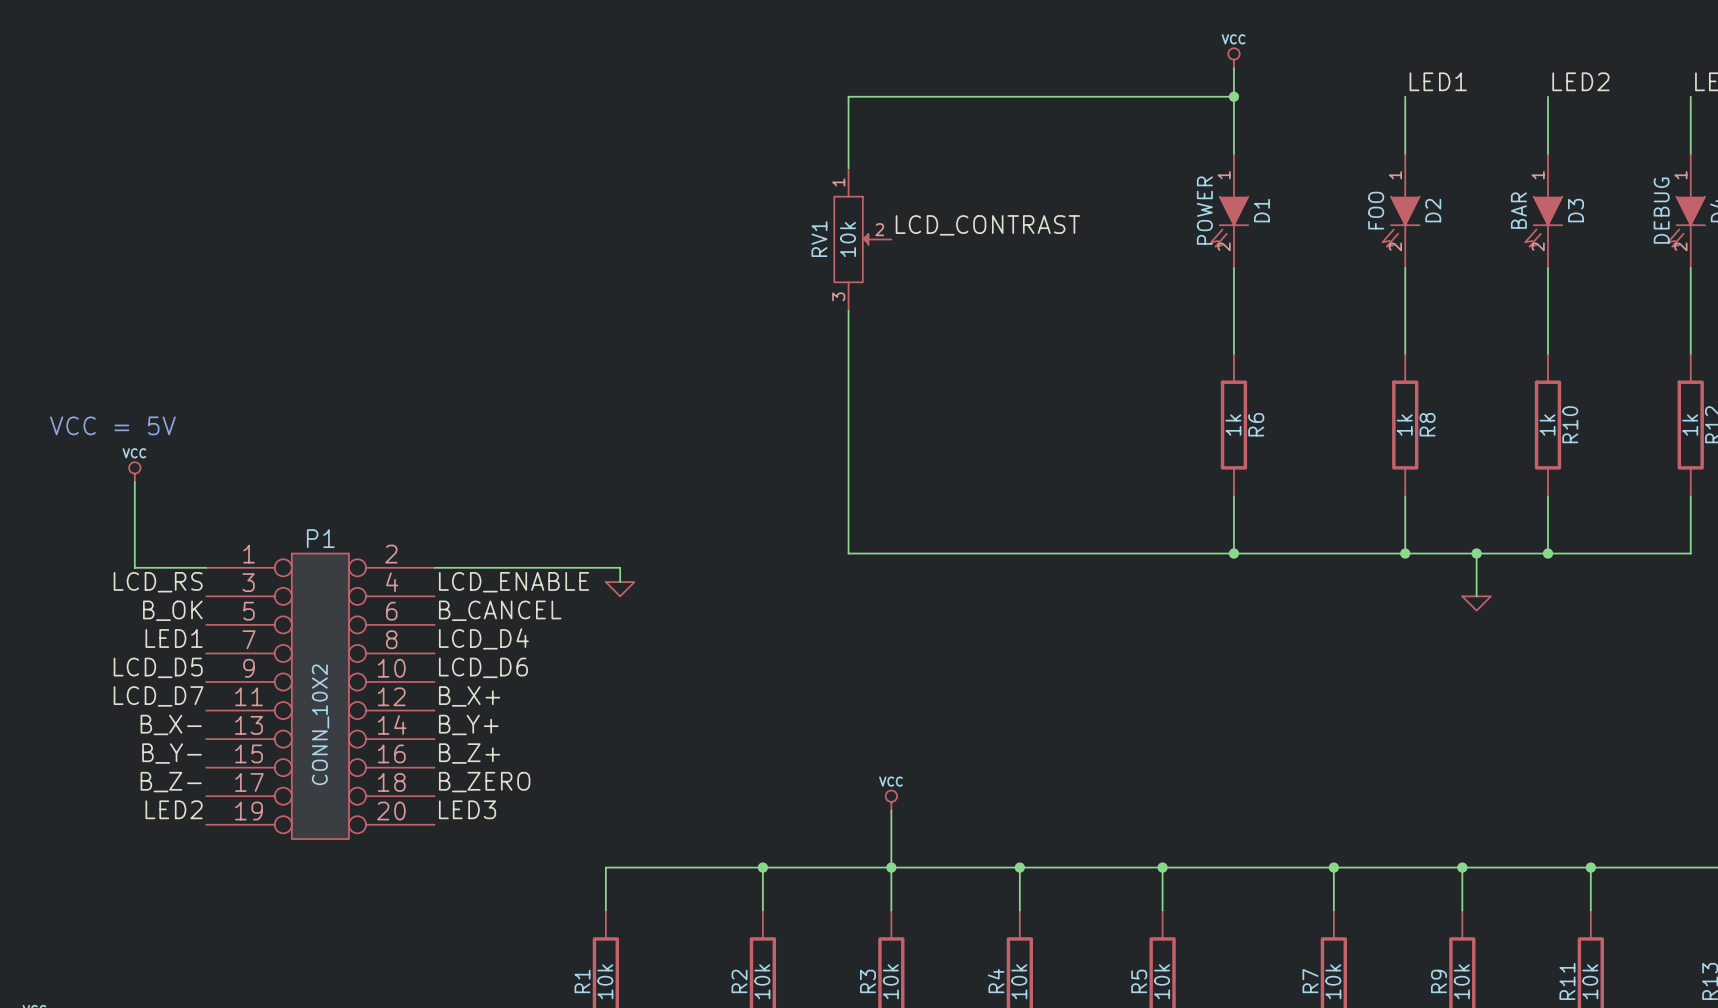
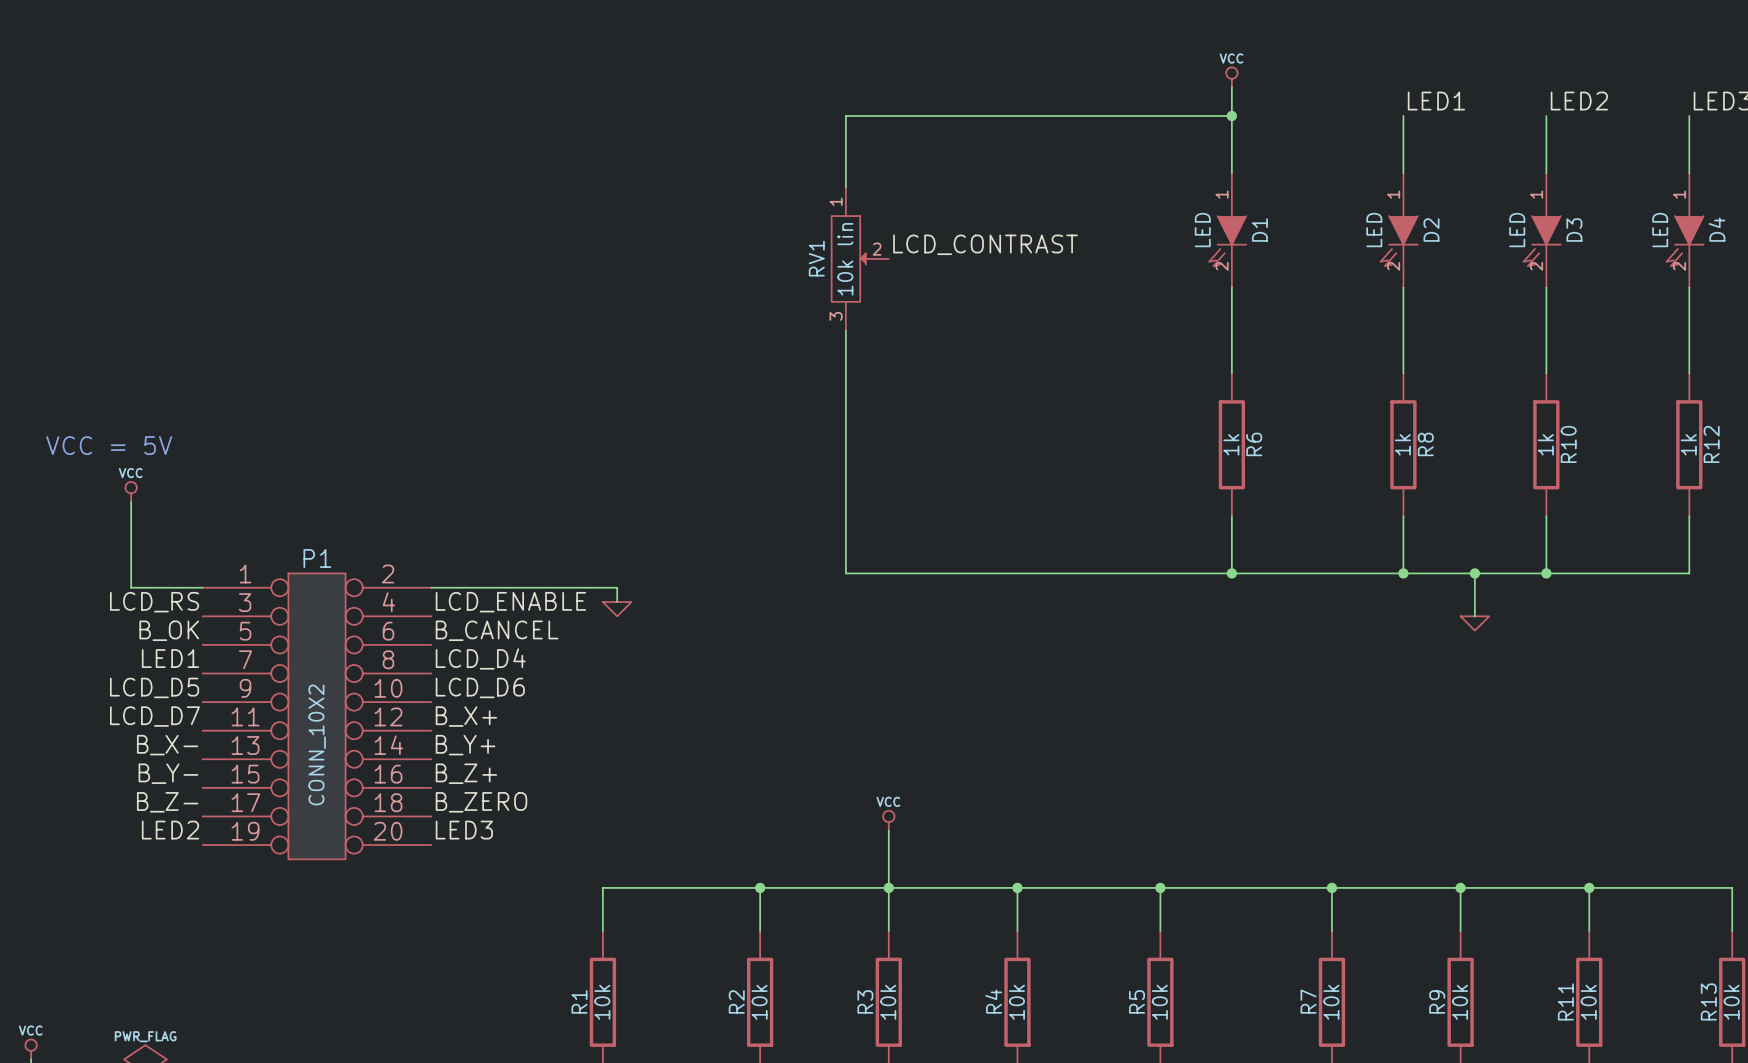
D1 value: POWER (1204, 210) -> LED (1202, 230)
D2 value: FOO (1376, 210) -> LED (1374, 230)
D3 value: BAR (1518, 210) -> LED (1517, 230)
D4 value: DEBUG (1661, 210) -> LED (1660, 230)
RV1 value: 10k (848, 239) -> 10k lin (845, 259)

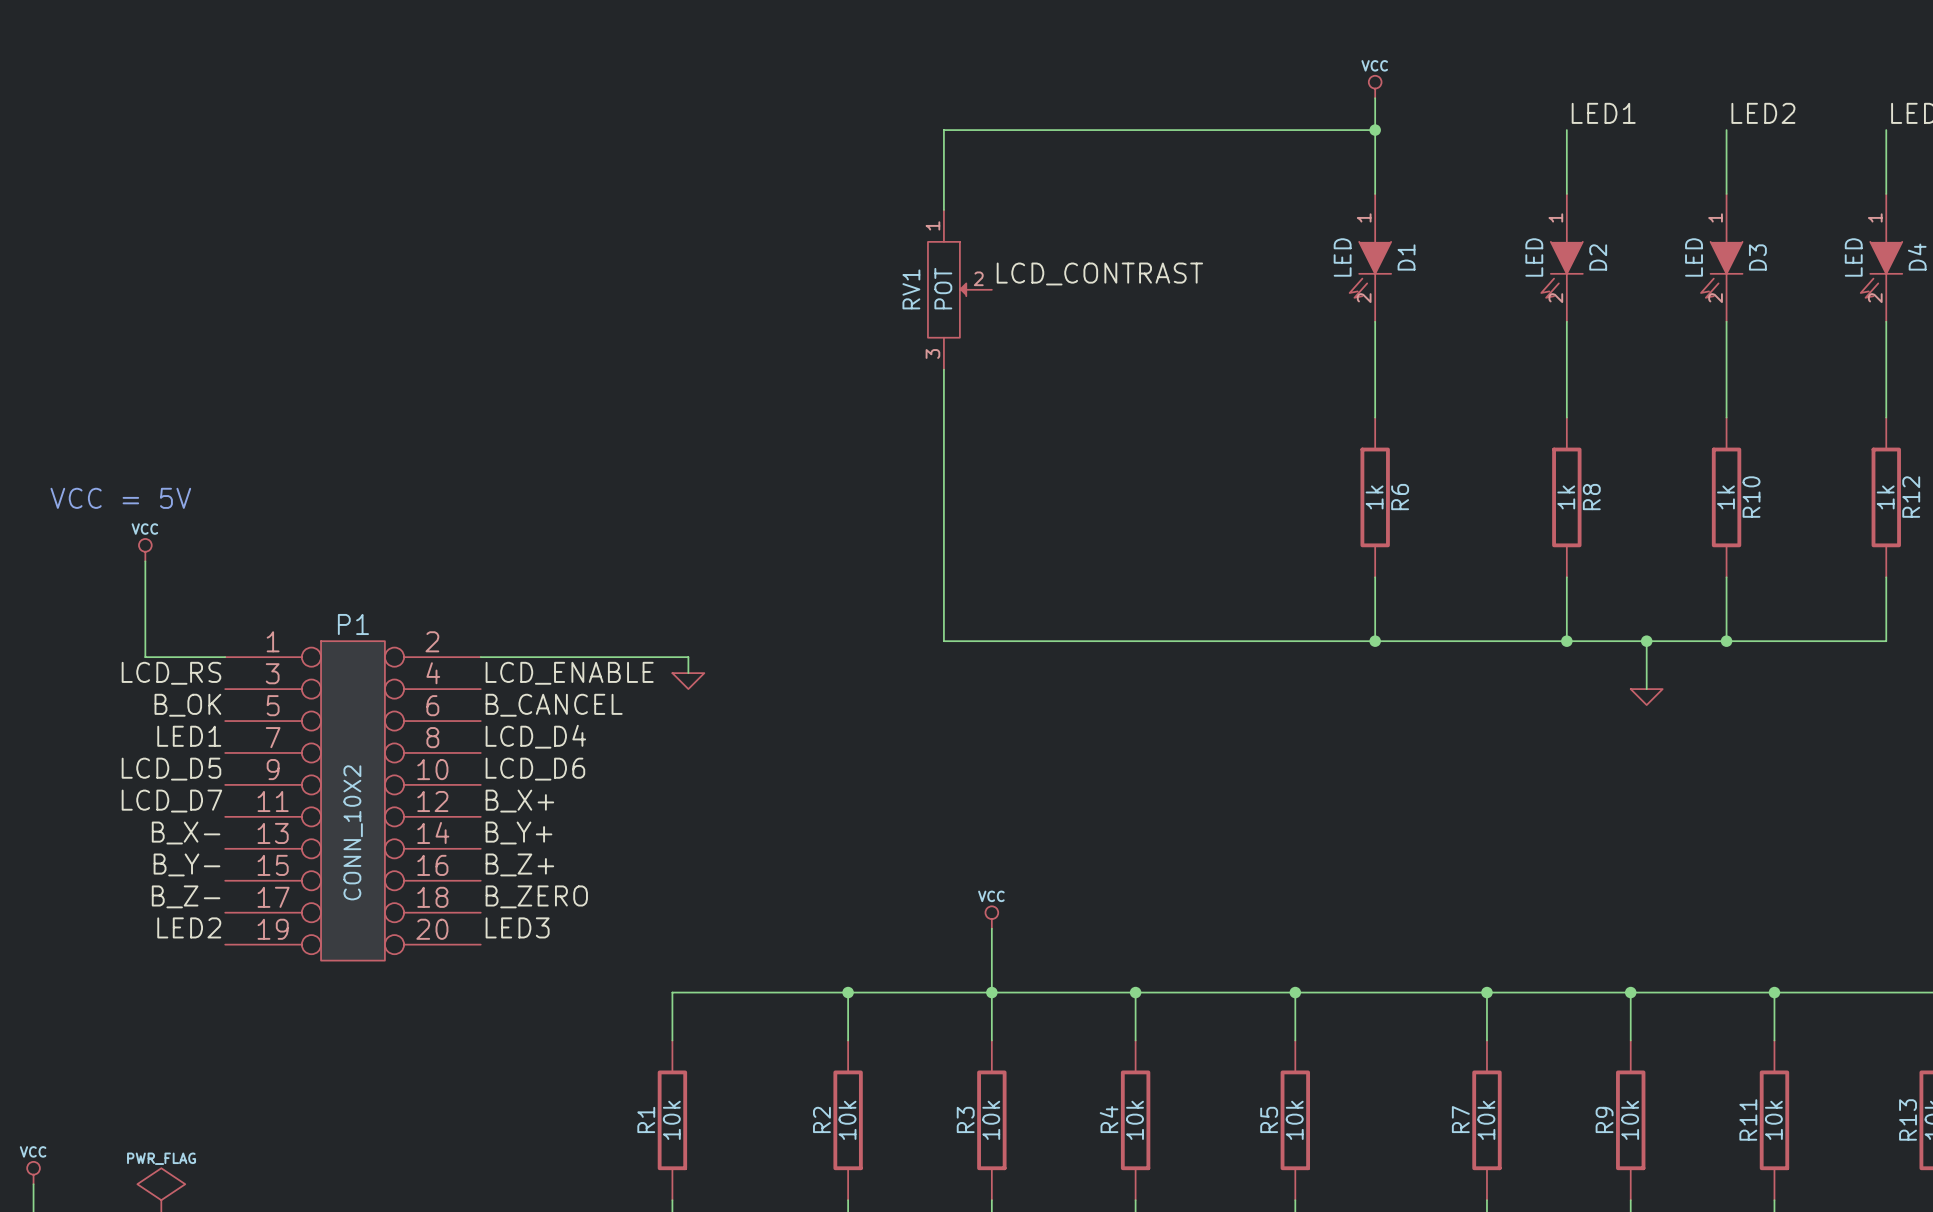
RV1 value: 10k lin (845, 259) -> POT (943, 288)

